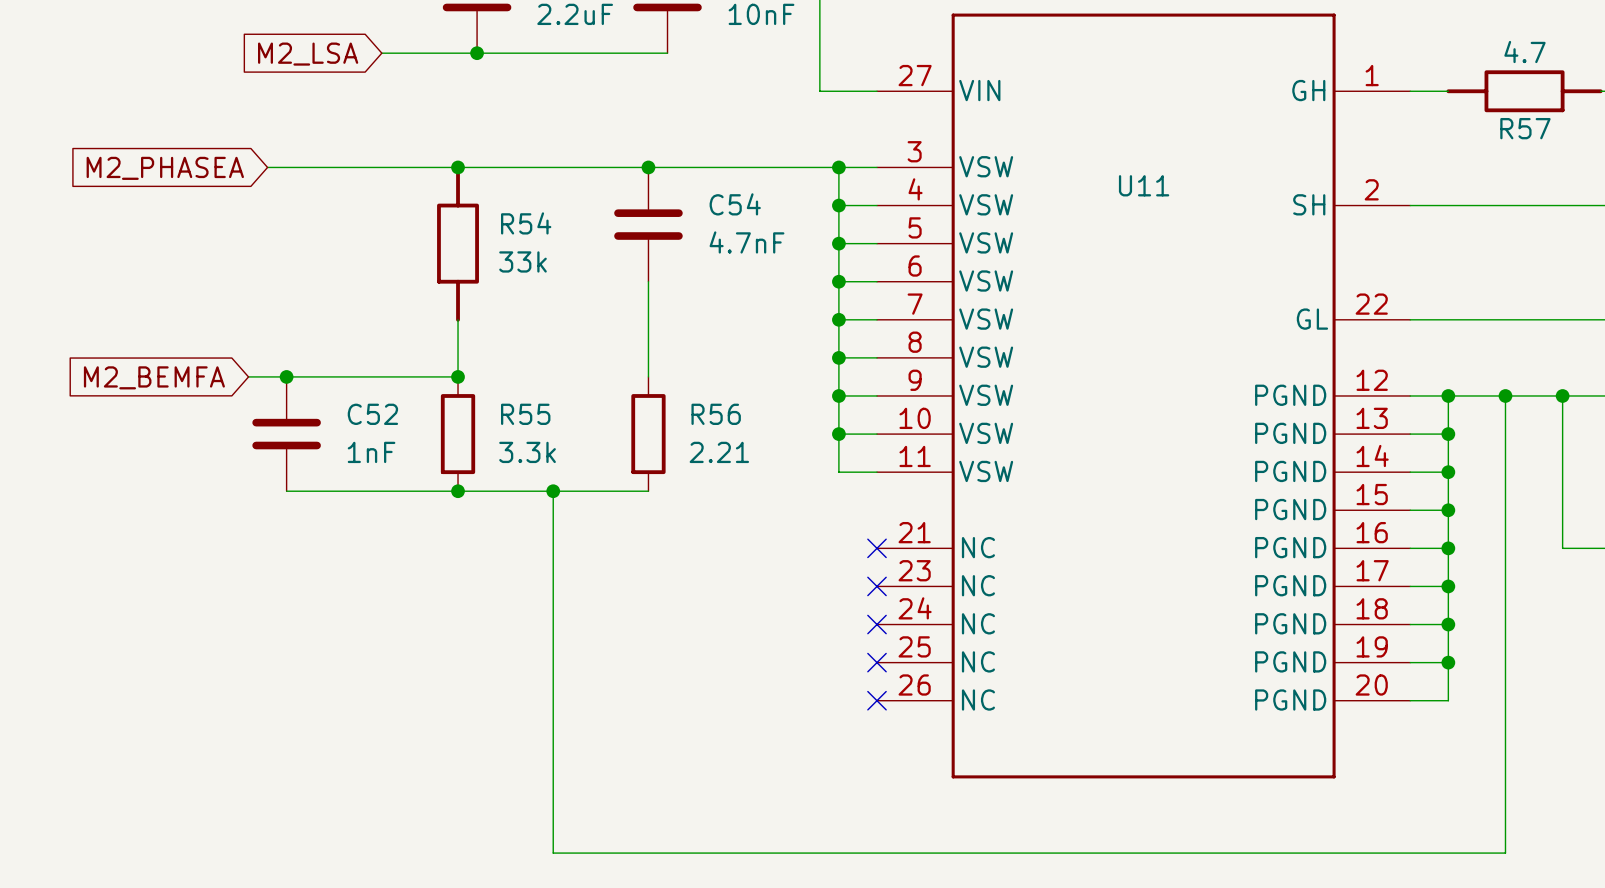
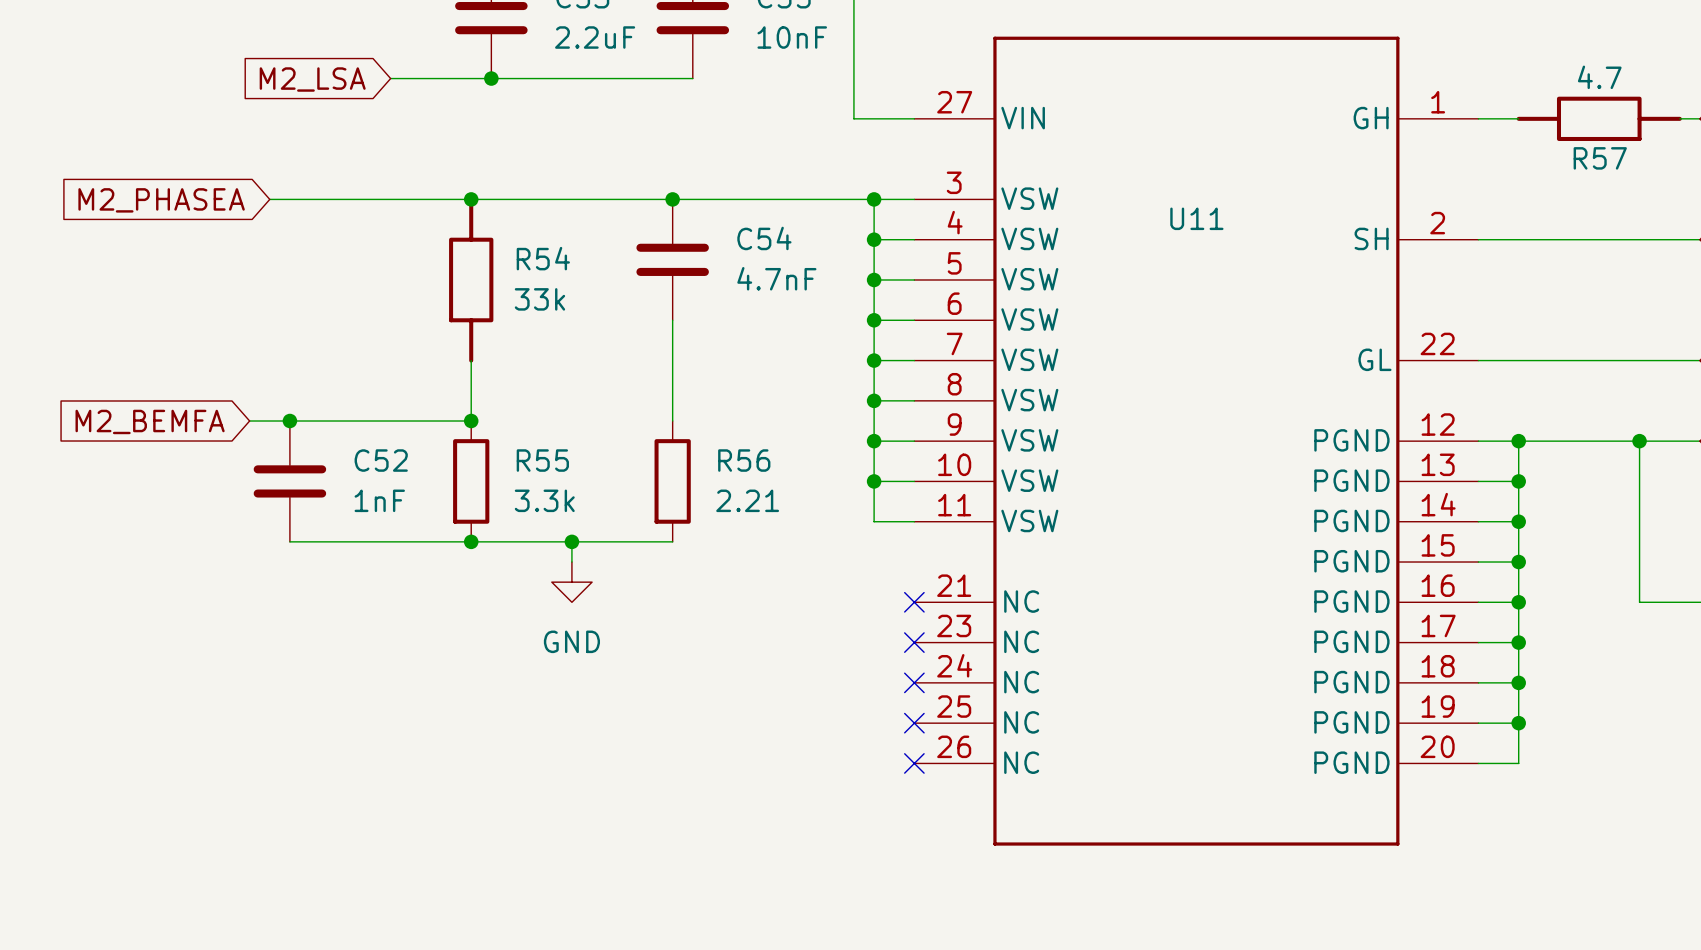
wire: (1505, 395) (1505, 853) (553, 853) (553, 510) -> none
junction: (1505, 395) -> none
power symbol: none -> GND (571, 582)

